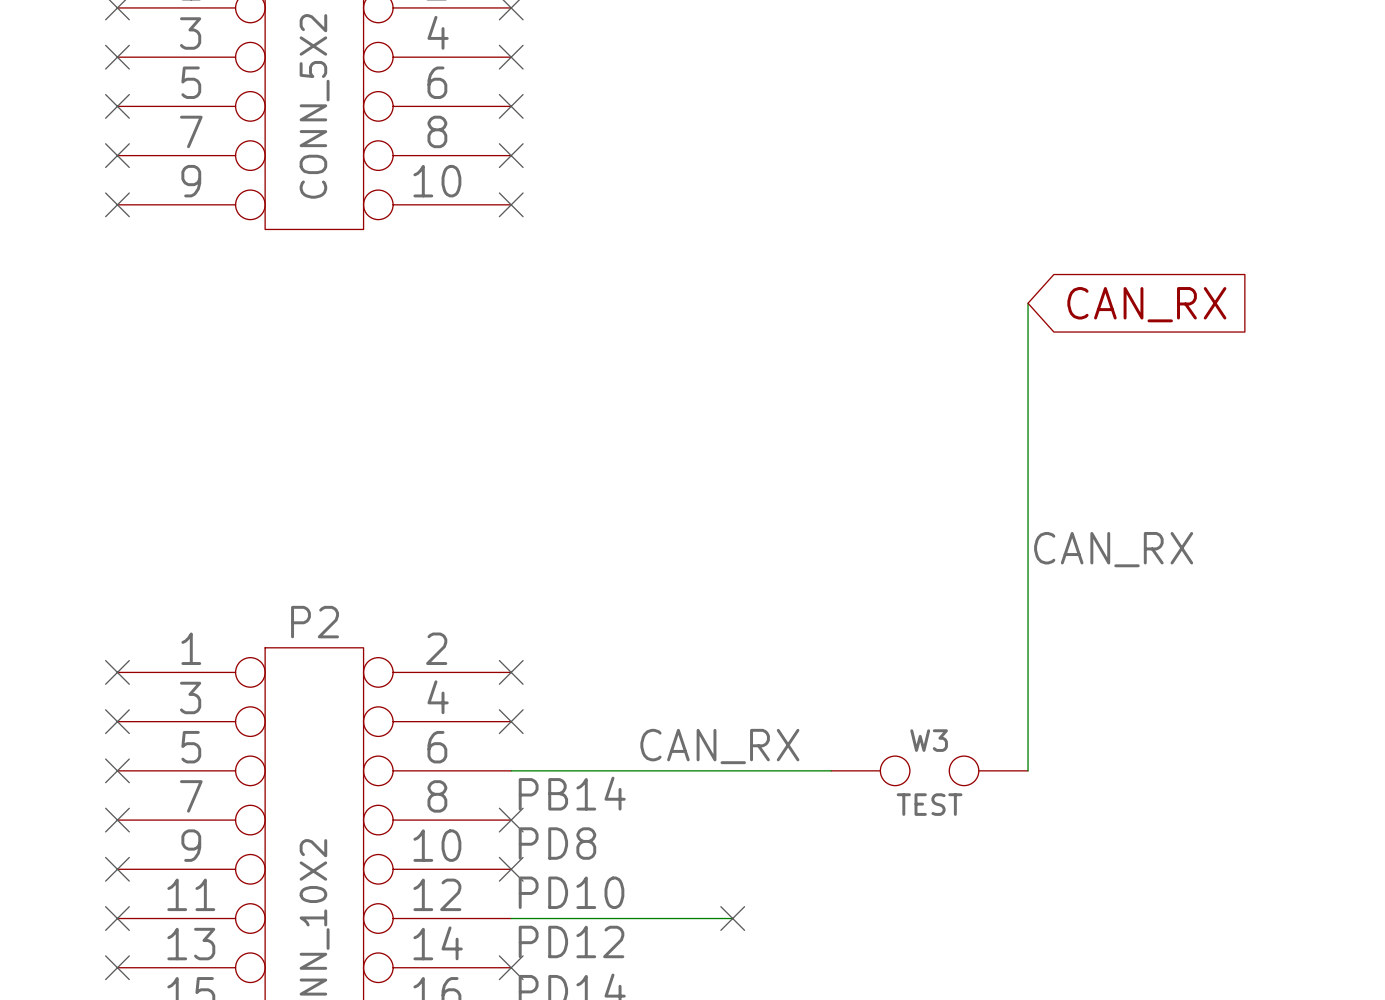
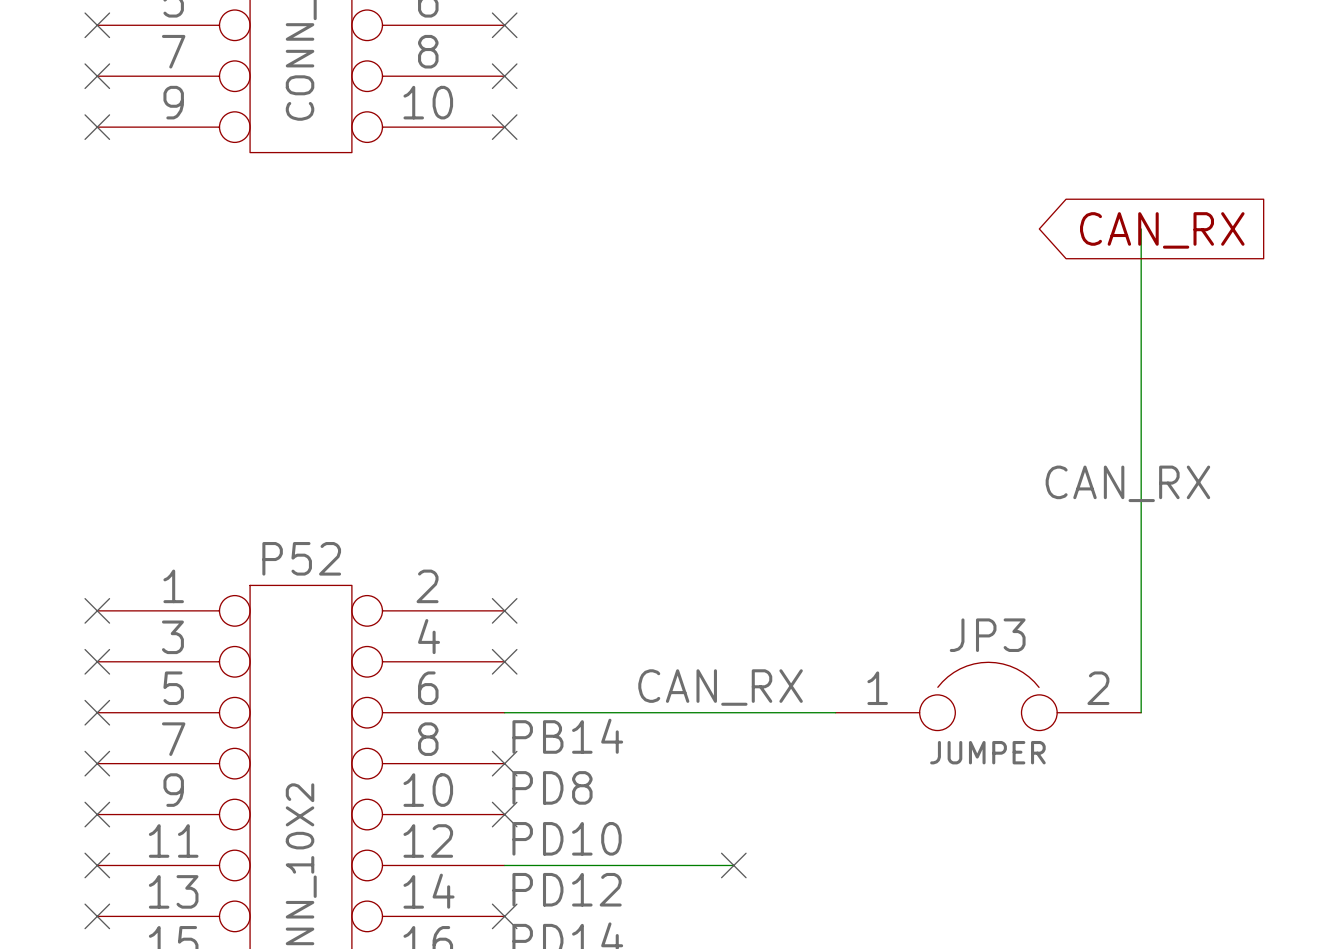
wire: (1028, 303) (1028, 770) -> (1141, 228) (1141, 712)
P2 name: P2 (315, 622) -> P52 (301, 558)
JP3: none -> JUMPER (988, 696)
W3: TEST (929, 770) -> none

